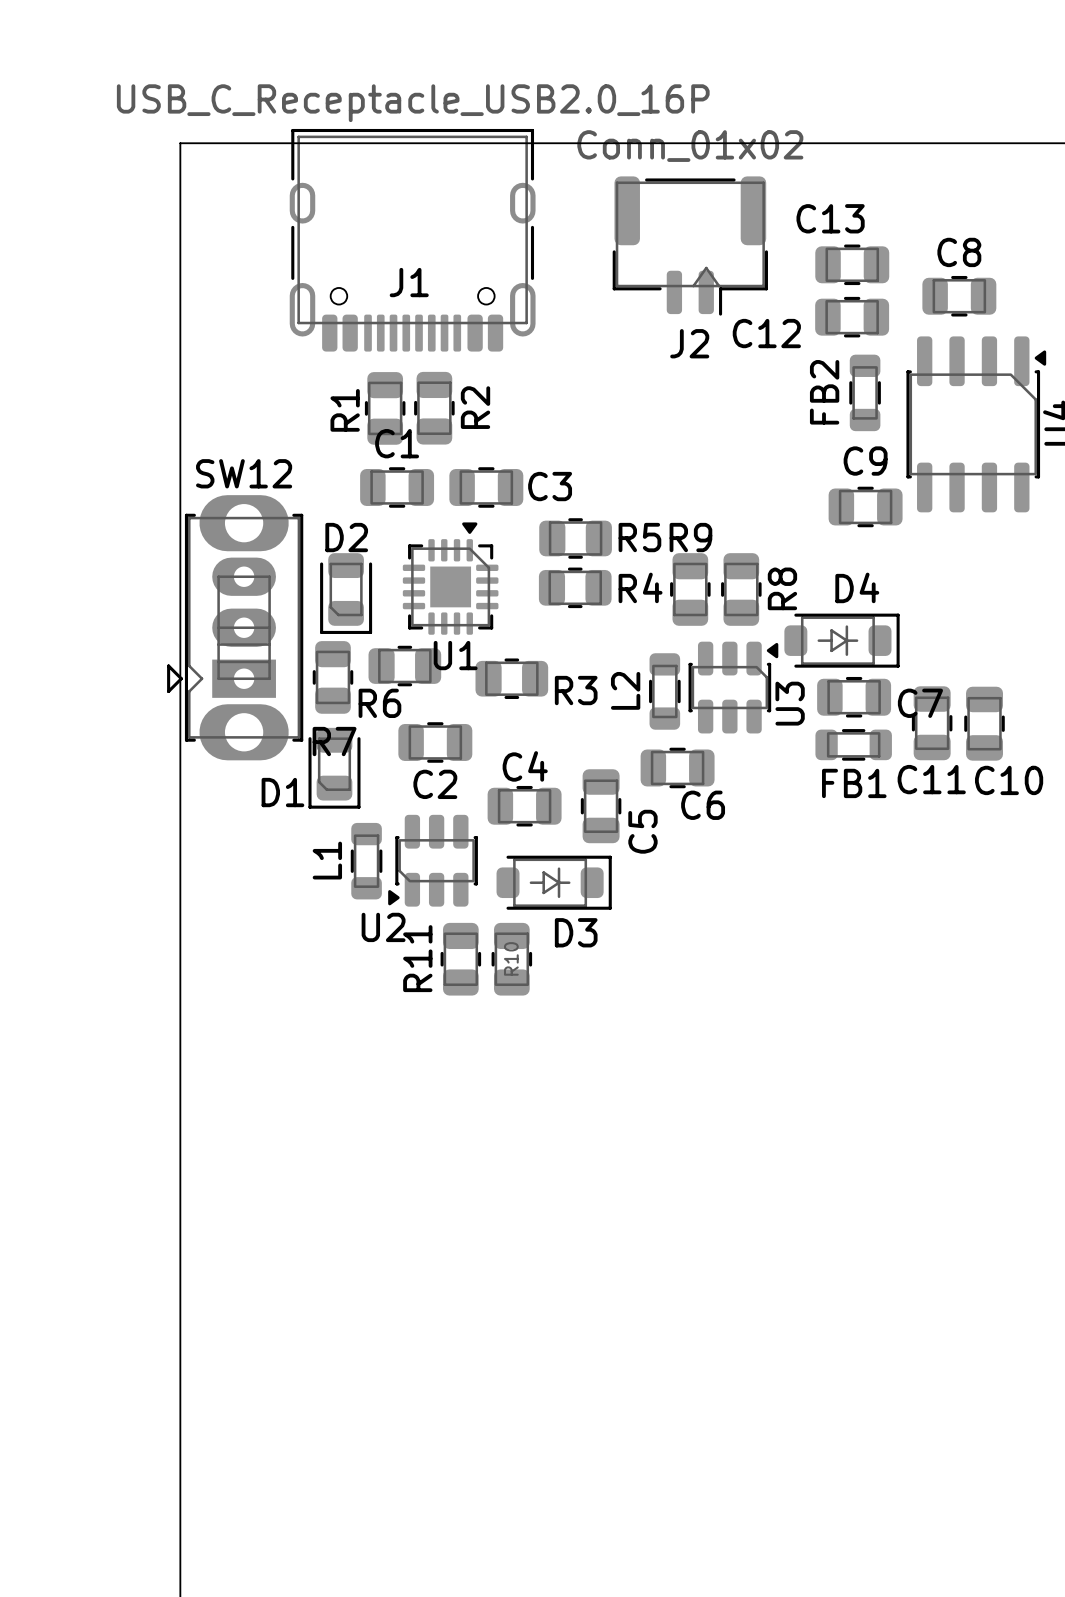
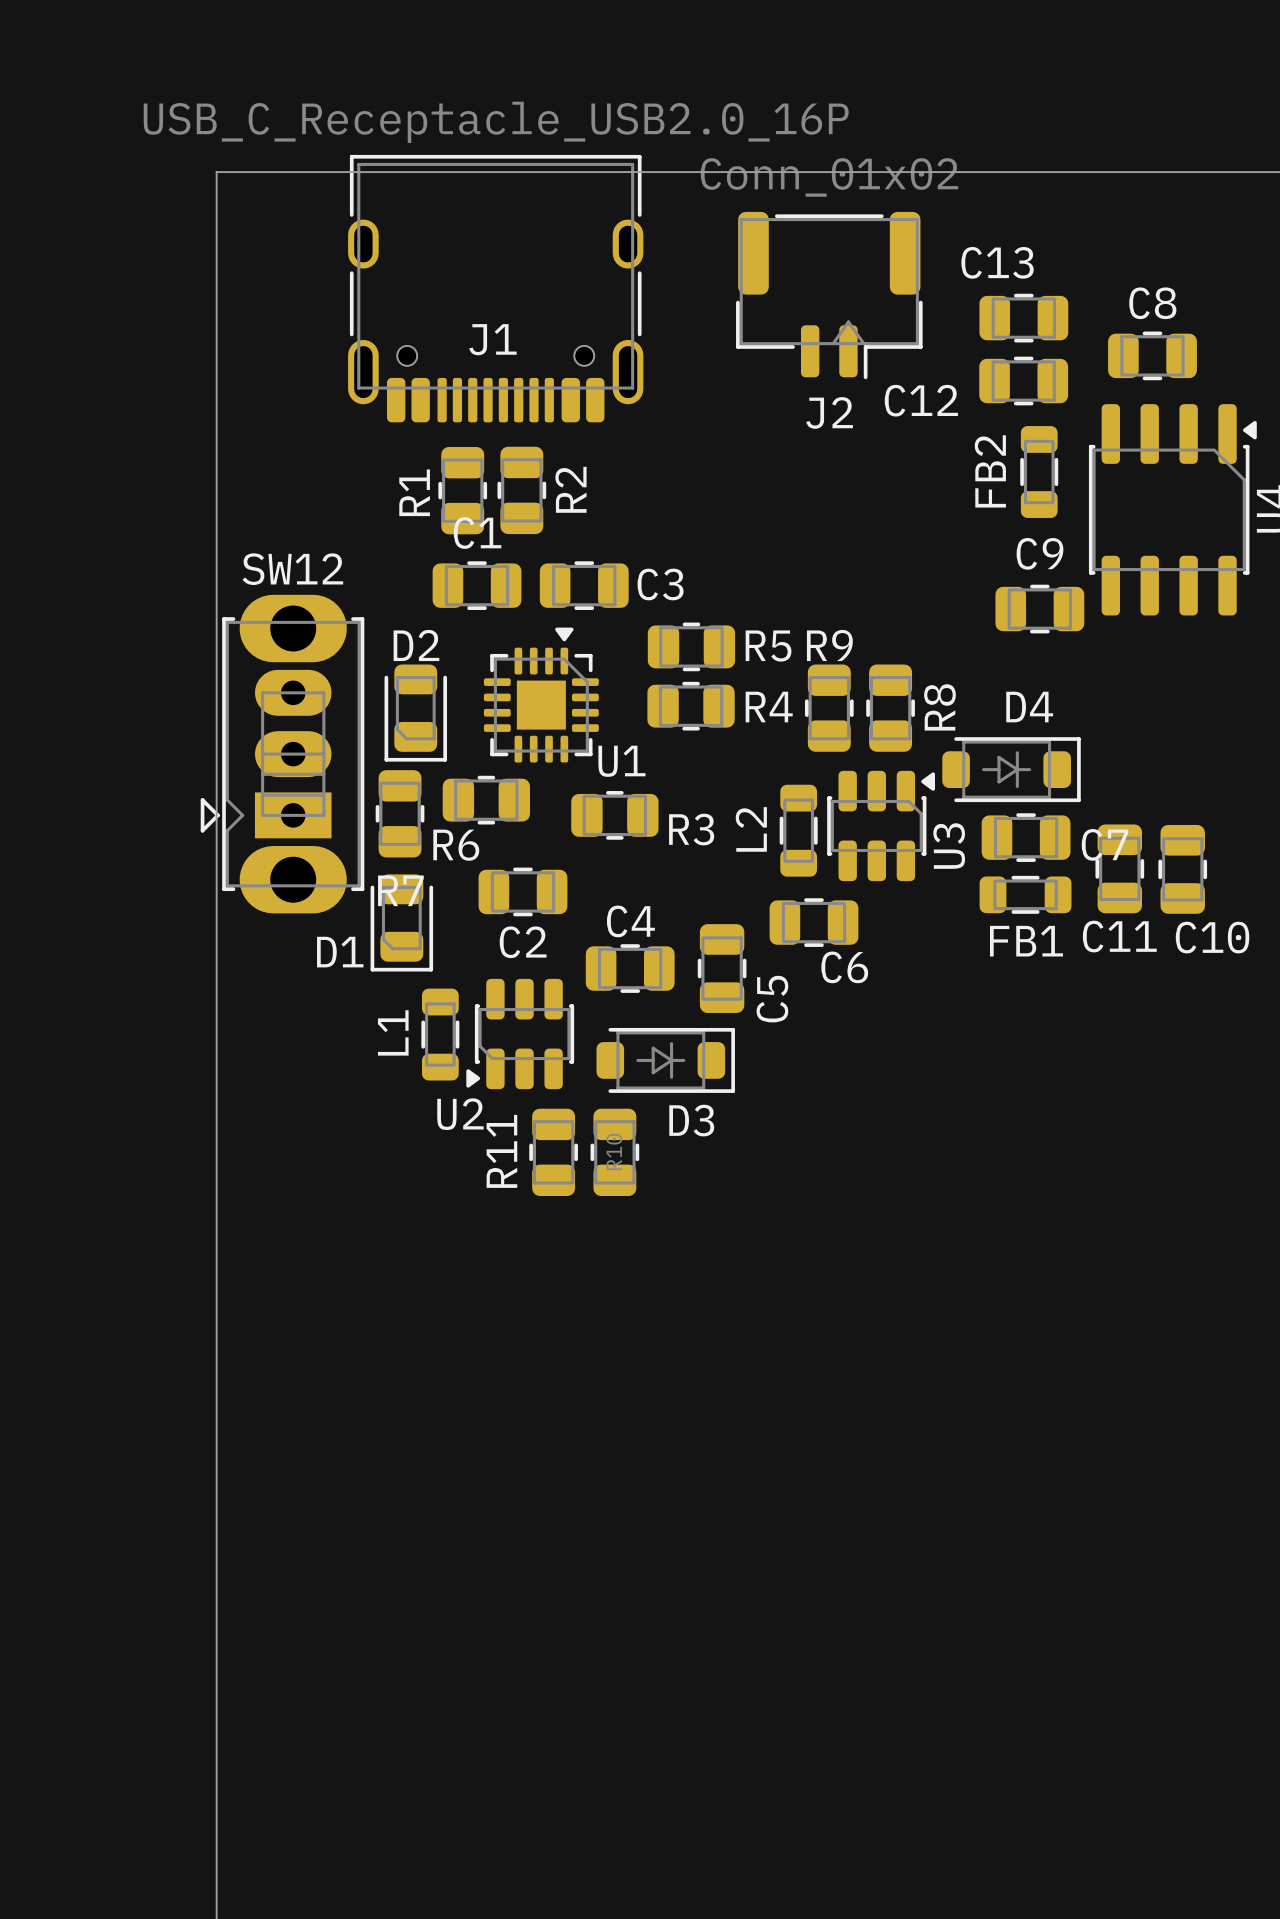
U1 name position: U1 (455, 655) -> U1 (621, 761)

